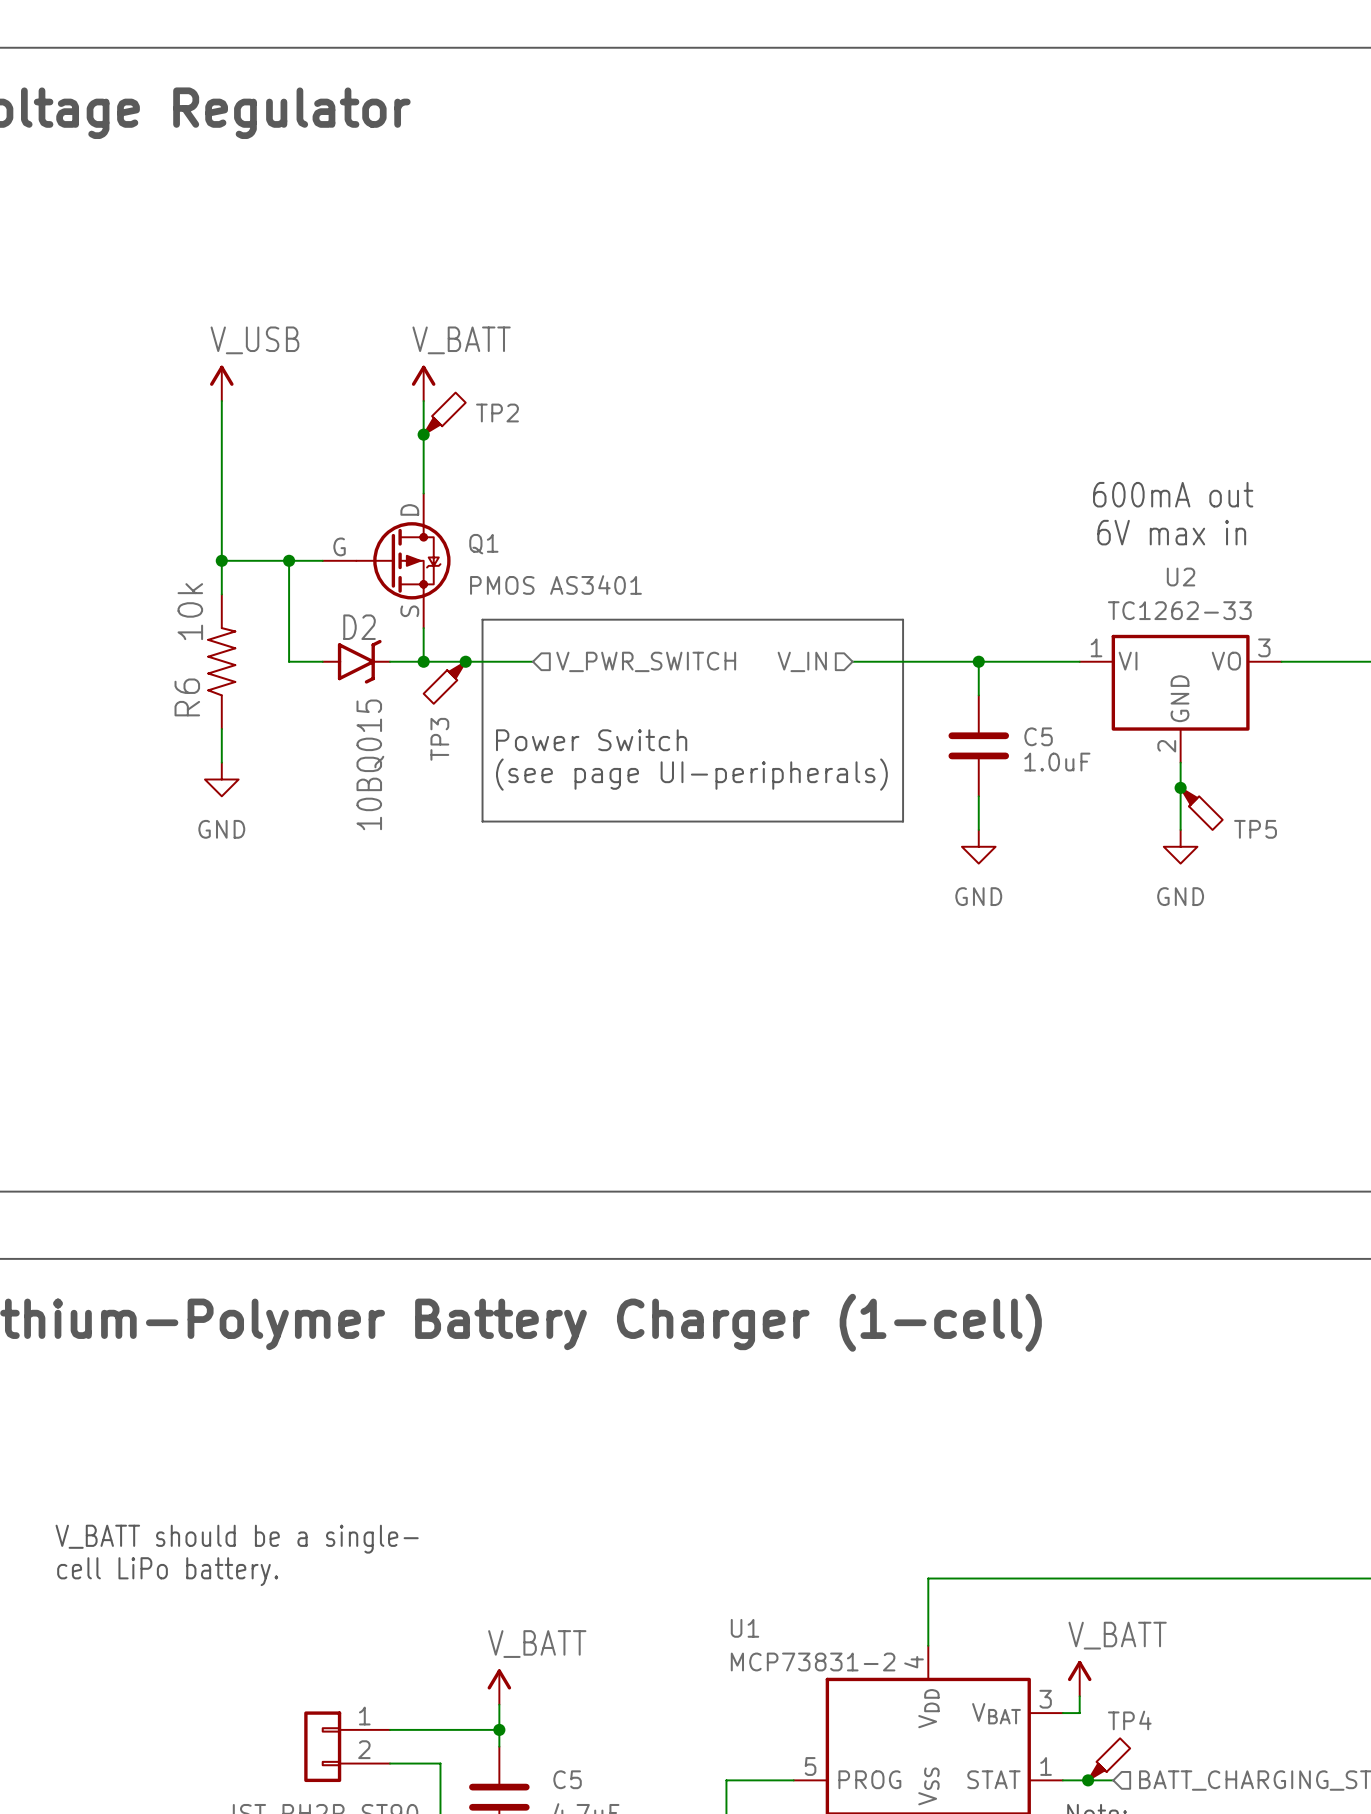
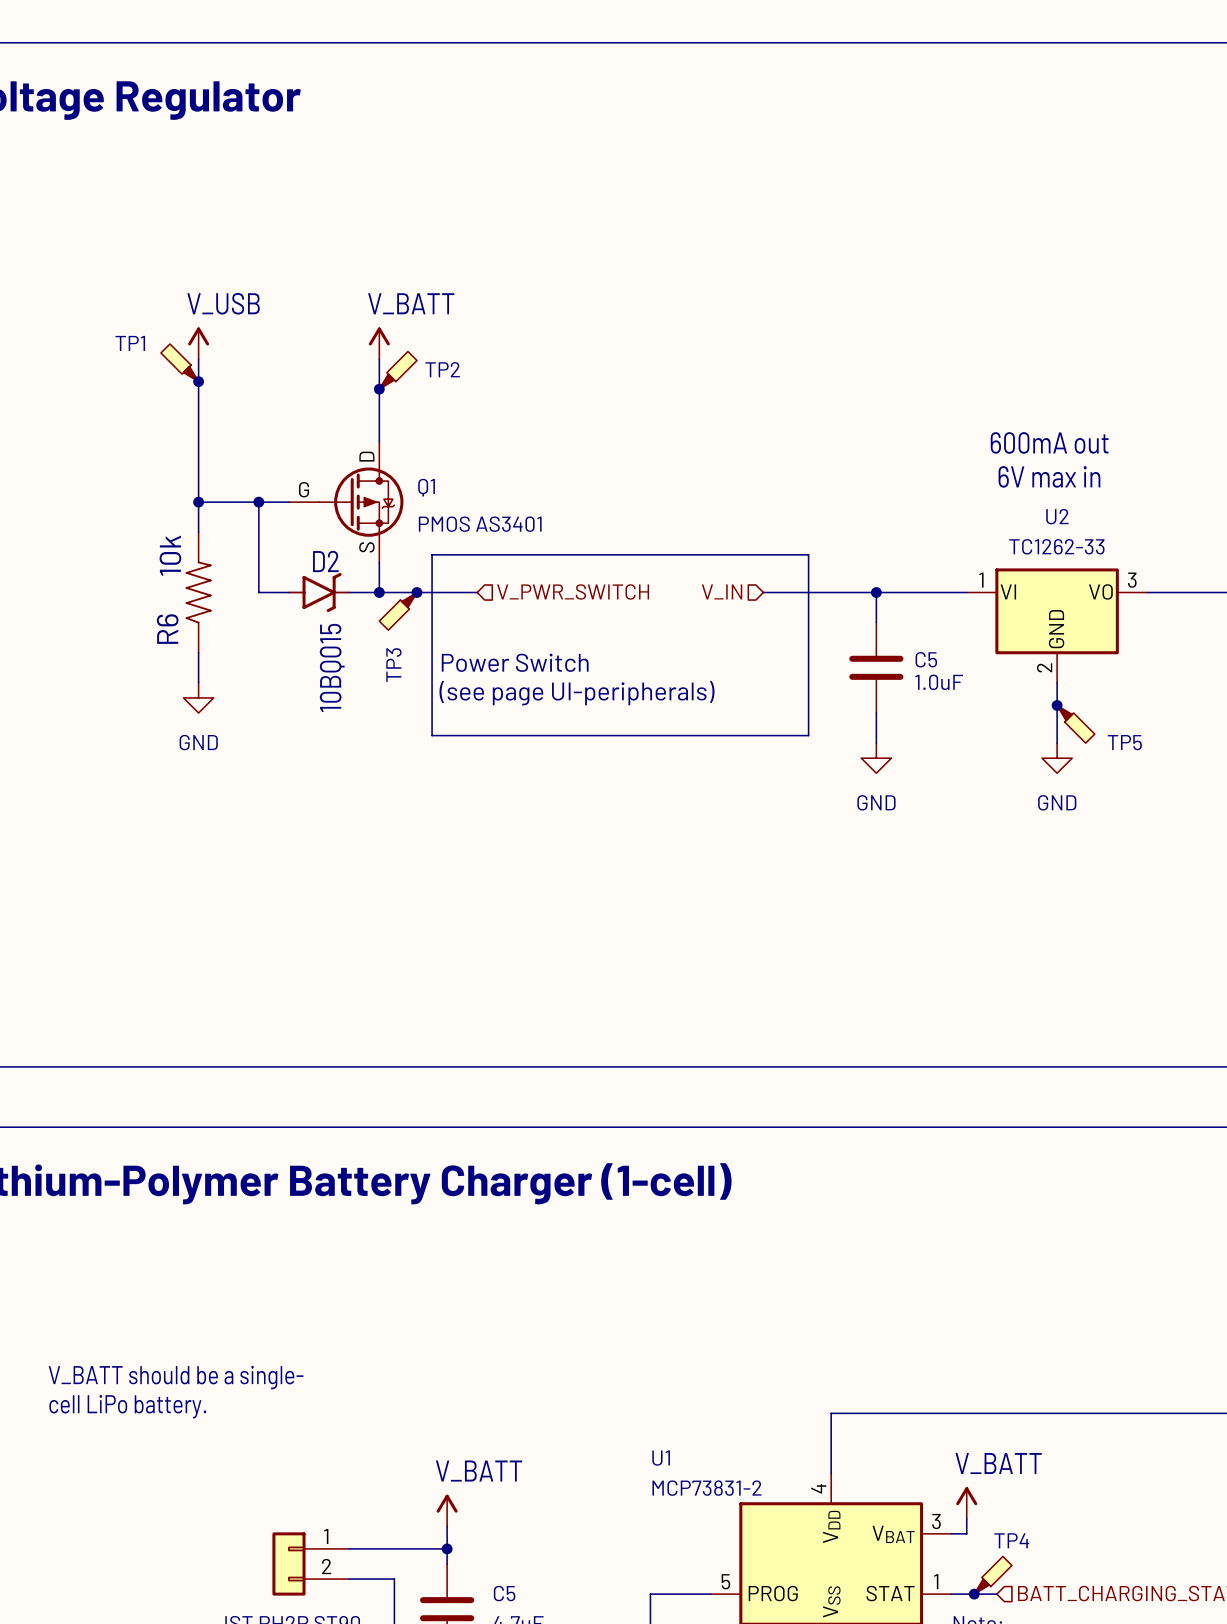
TP1: none -> (179, 362)
junction: none -> (198, 381)

